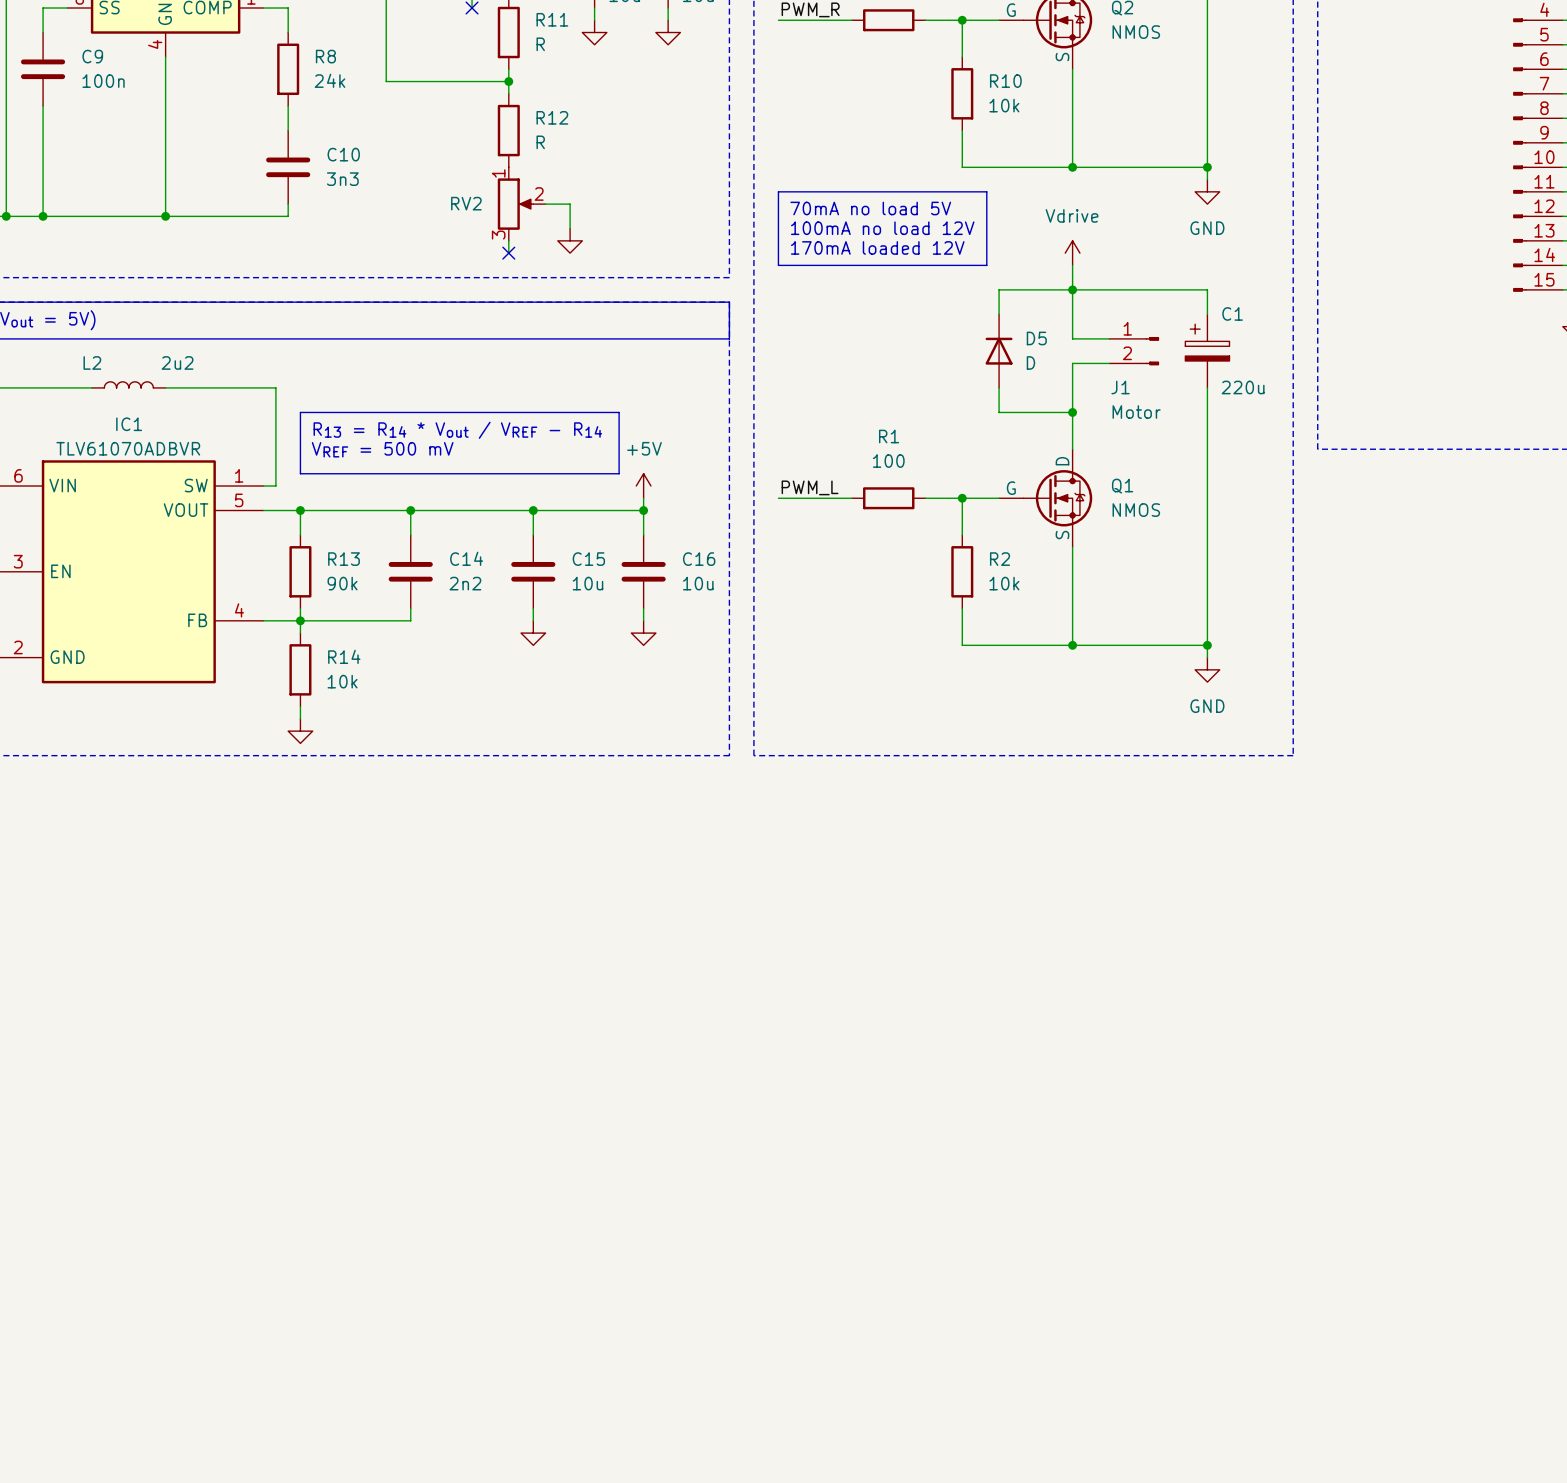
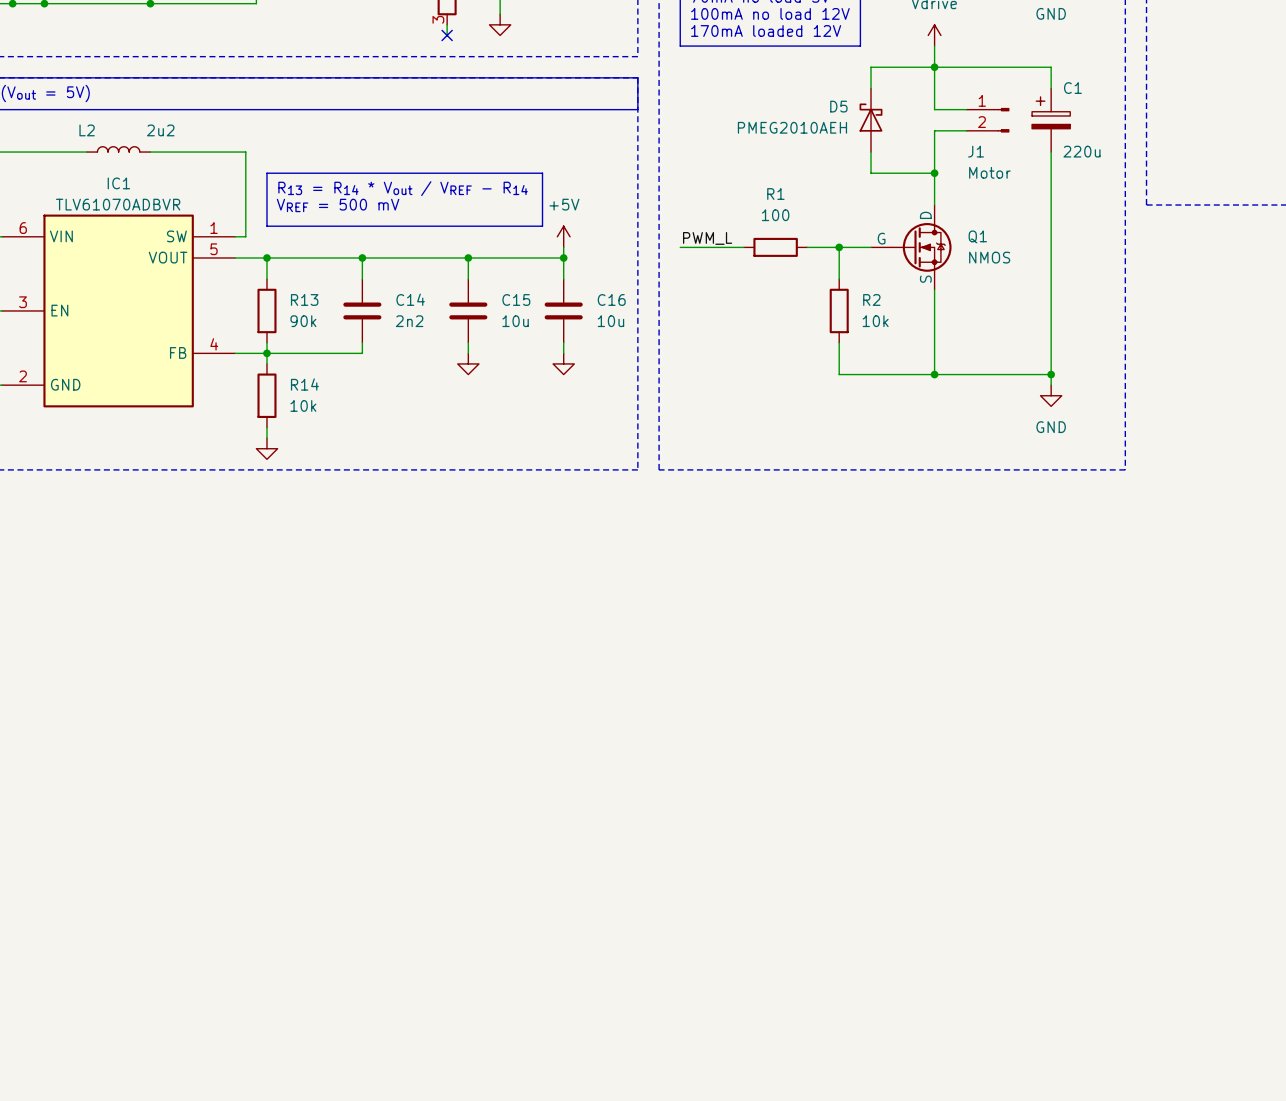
D5 symbol: [985, 314, 1013, 388] -> [859, 88, 883, 153]
D5 name position: D5 (1036, 338) -> D5 (838, 106)
D5 value: D (1030, 362) -> PMEG2010AEH (792, 127)

